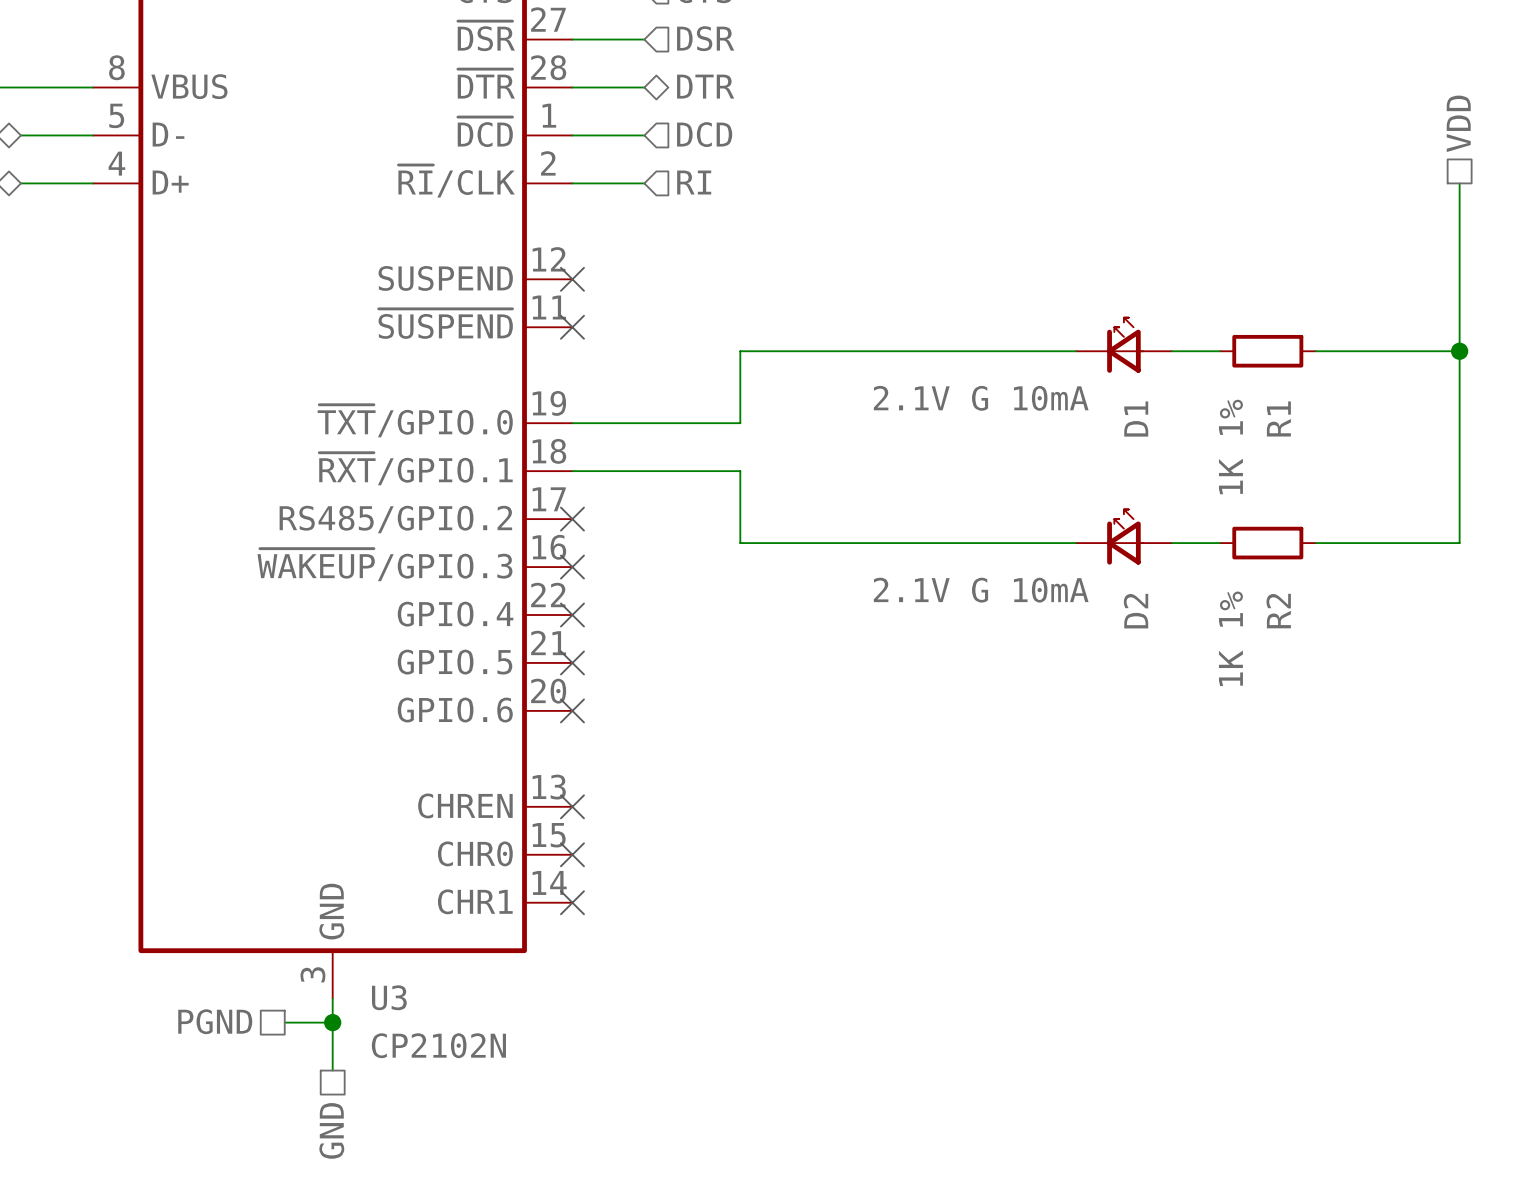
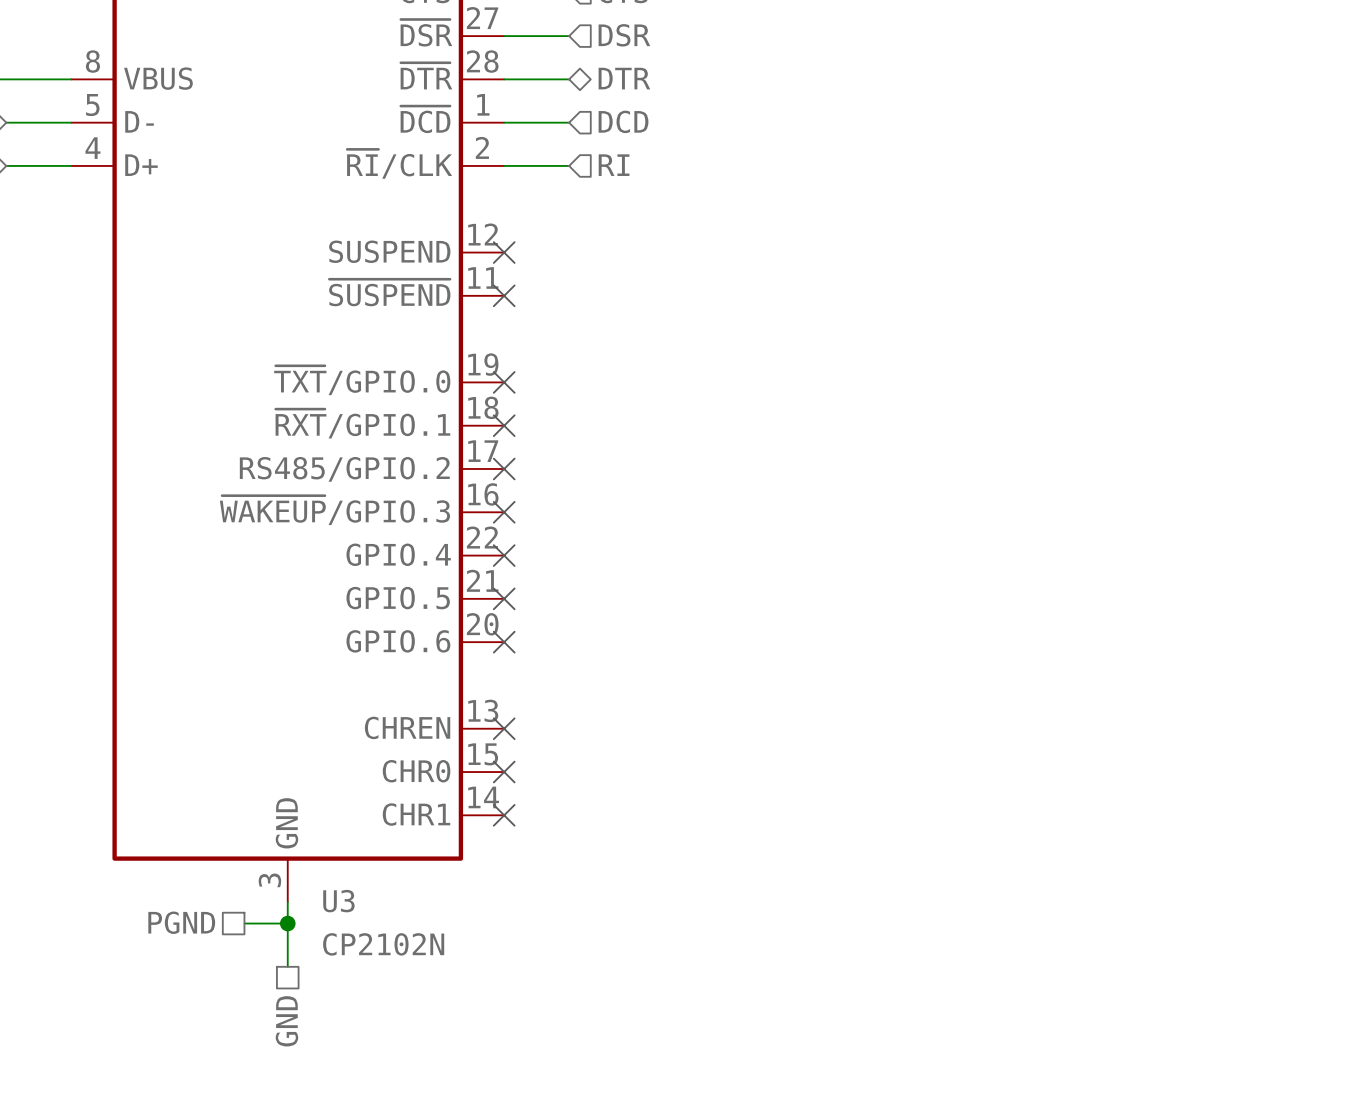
hierarchical label: VDD (1458, 123) -> none
wire: (1459, 183) (1459, 543) (1315, 543) -> none
D1: 2.1V G 10mA (1123, 345) -> none
wire: (1075, 351) (740, 351) (740, 423) (572, 423) -> none
wire: (1171, 351) (1219, 351) -> none
R1: 1K 1% (1267, 351) -> none
wire: (1315, 351) (1459, 351) -> none
junction: (1459, 351) -> none
no-connect mark: none -> (504, 382)
wire: (572, 471) (740, 471) (740, 543) (1075, 543) -> none
no-connect mark: none -> (504, 425)
D2: 2.1V G 10mA (1123, 537) -> none
wire: (1171, 543) (1219, 543) -> none
R2: 1K 1% (1267, 543) -> none

